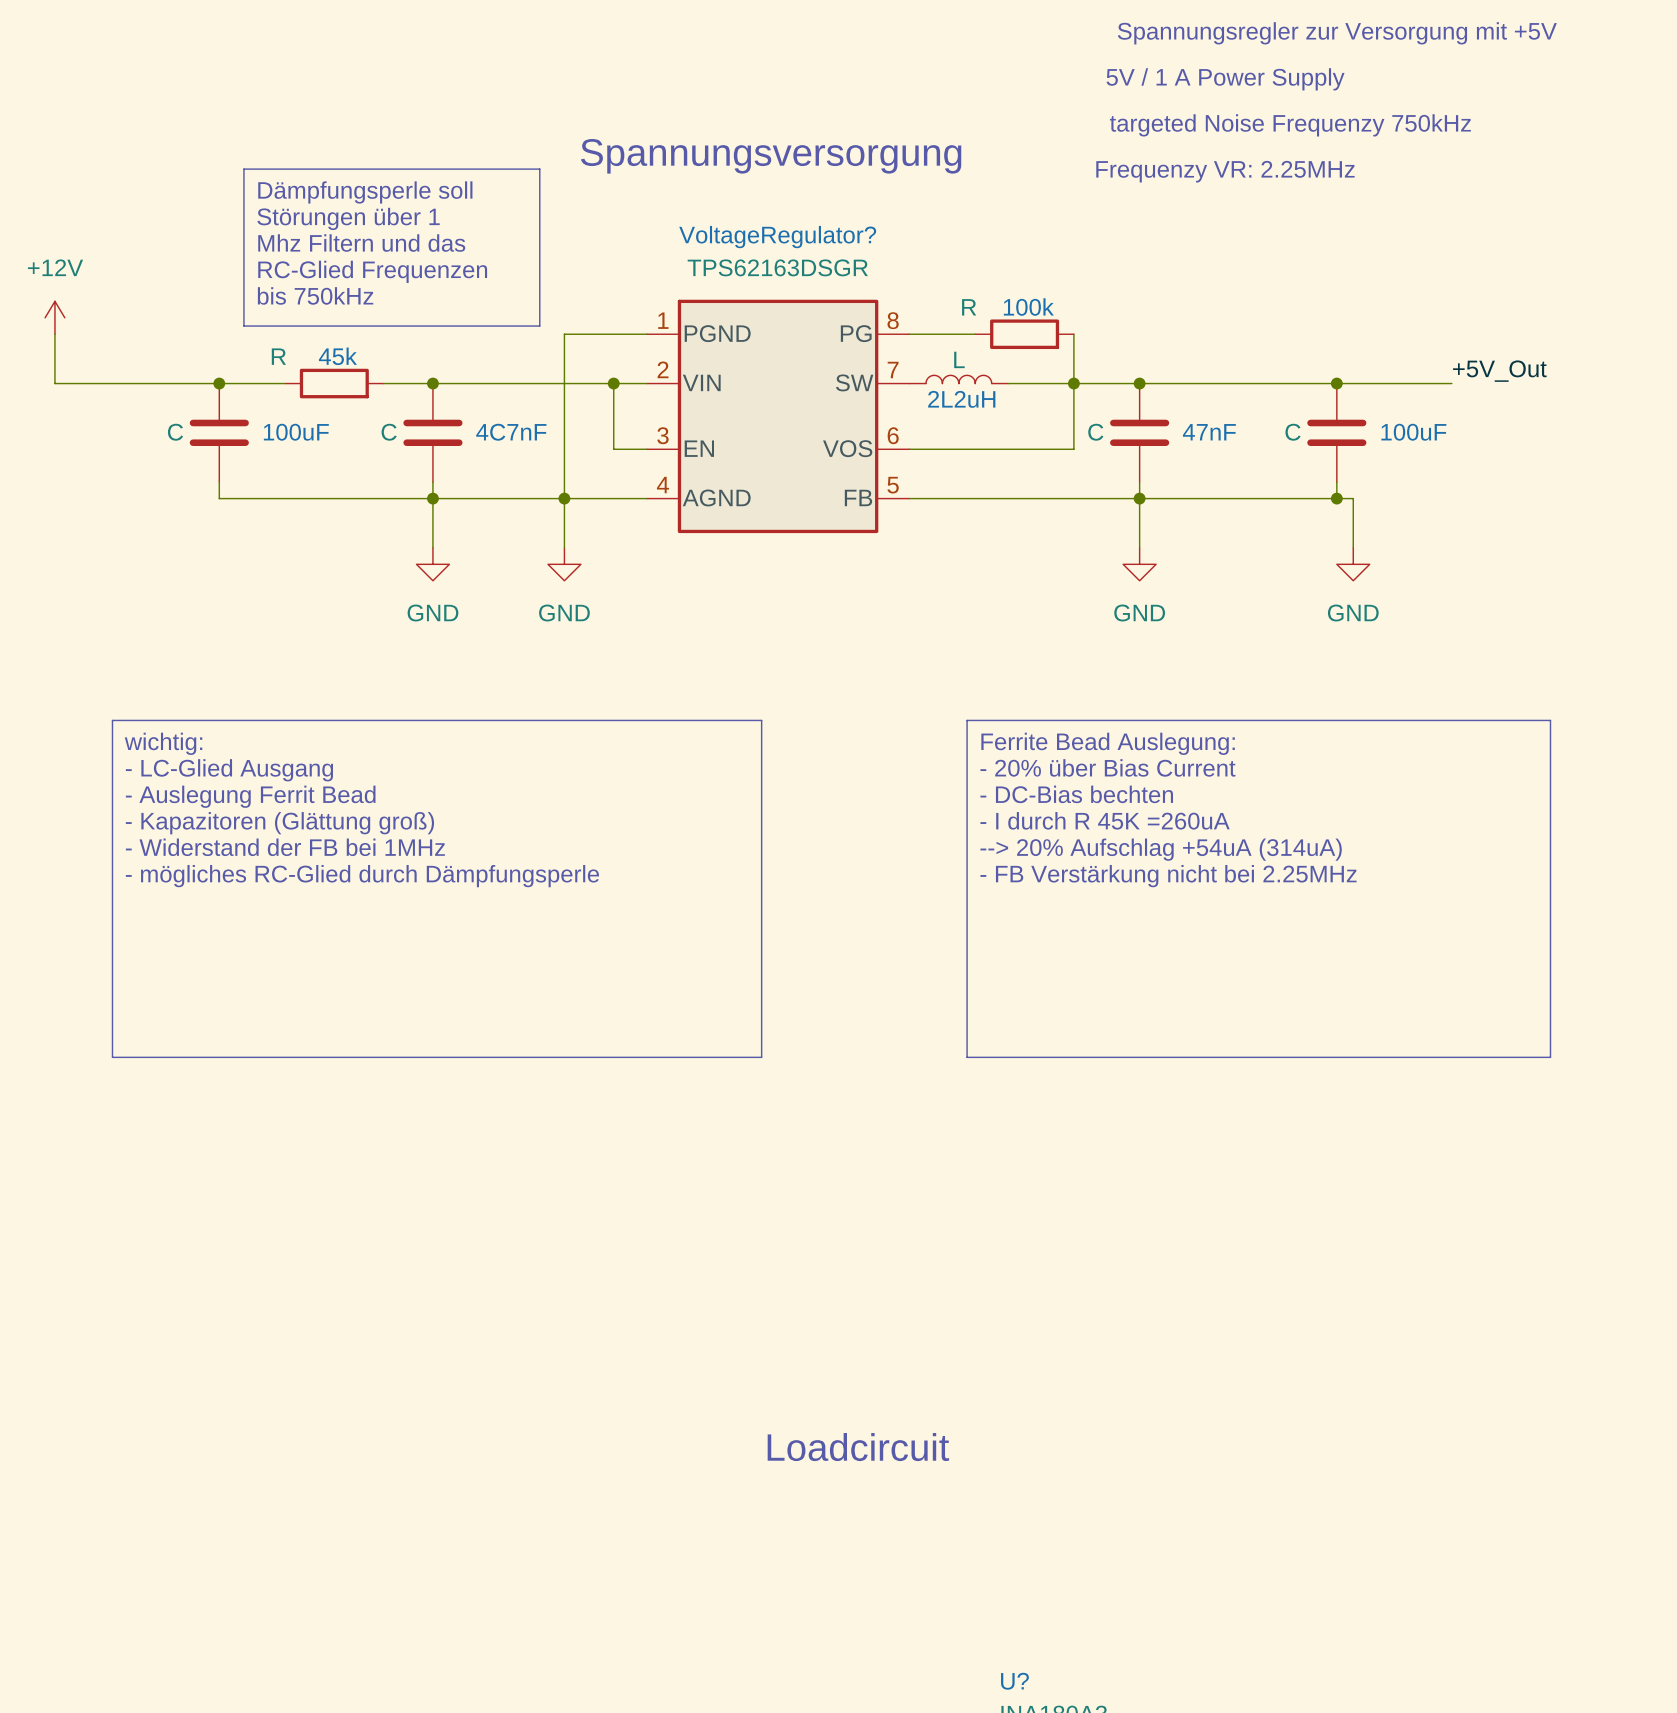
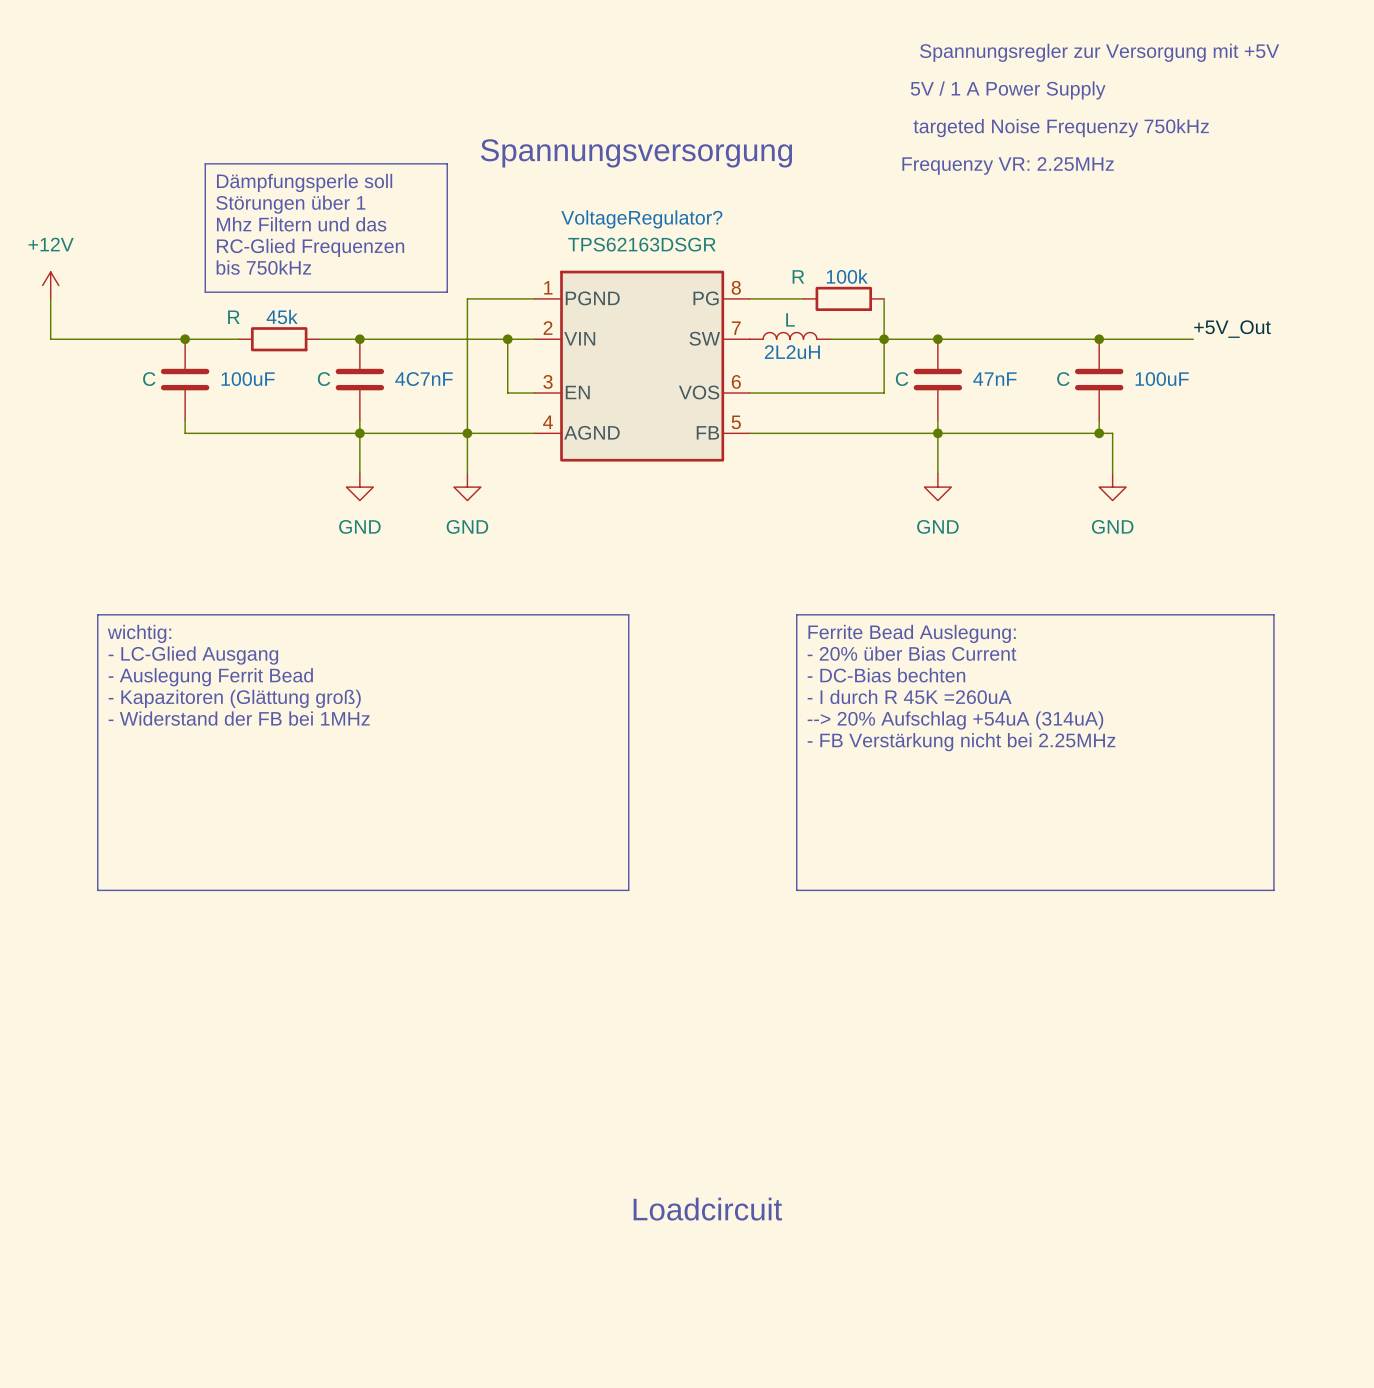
text: - mögliches RC-Glied durch Dämpfungsperle (362, 876) -> none

